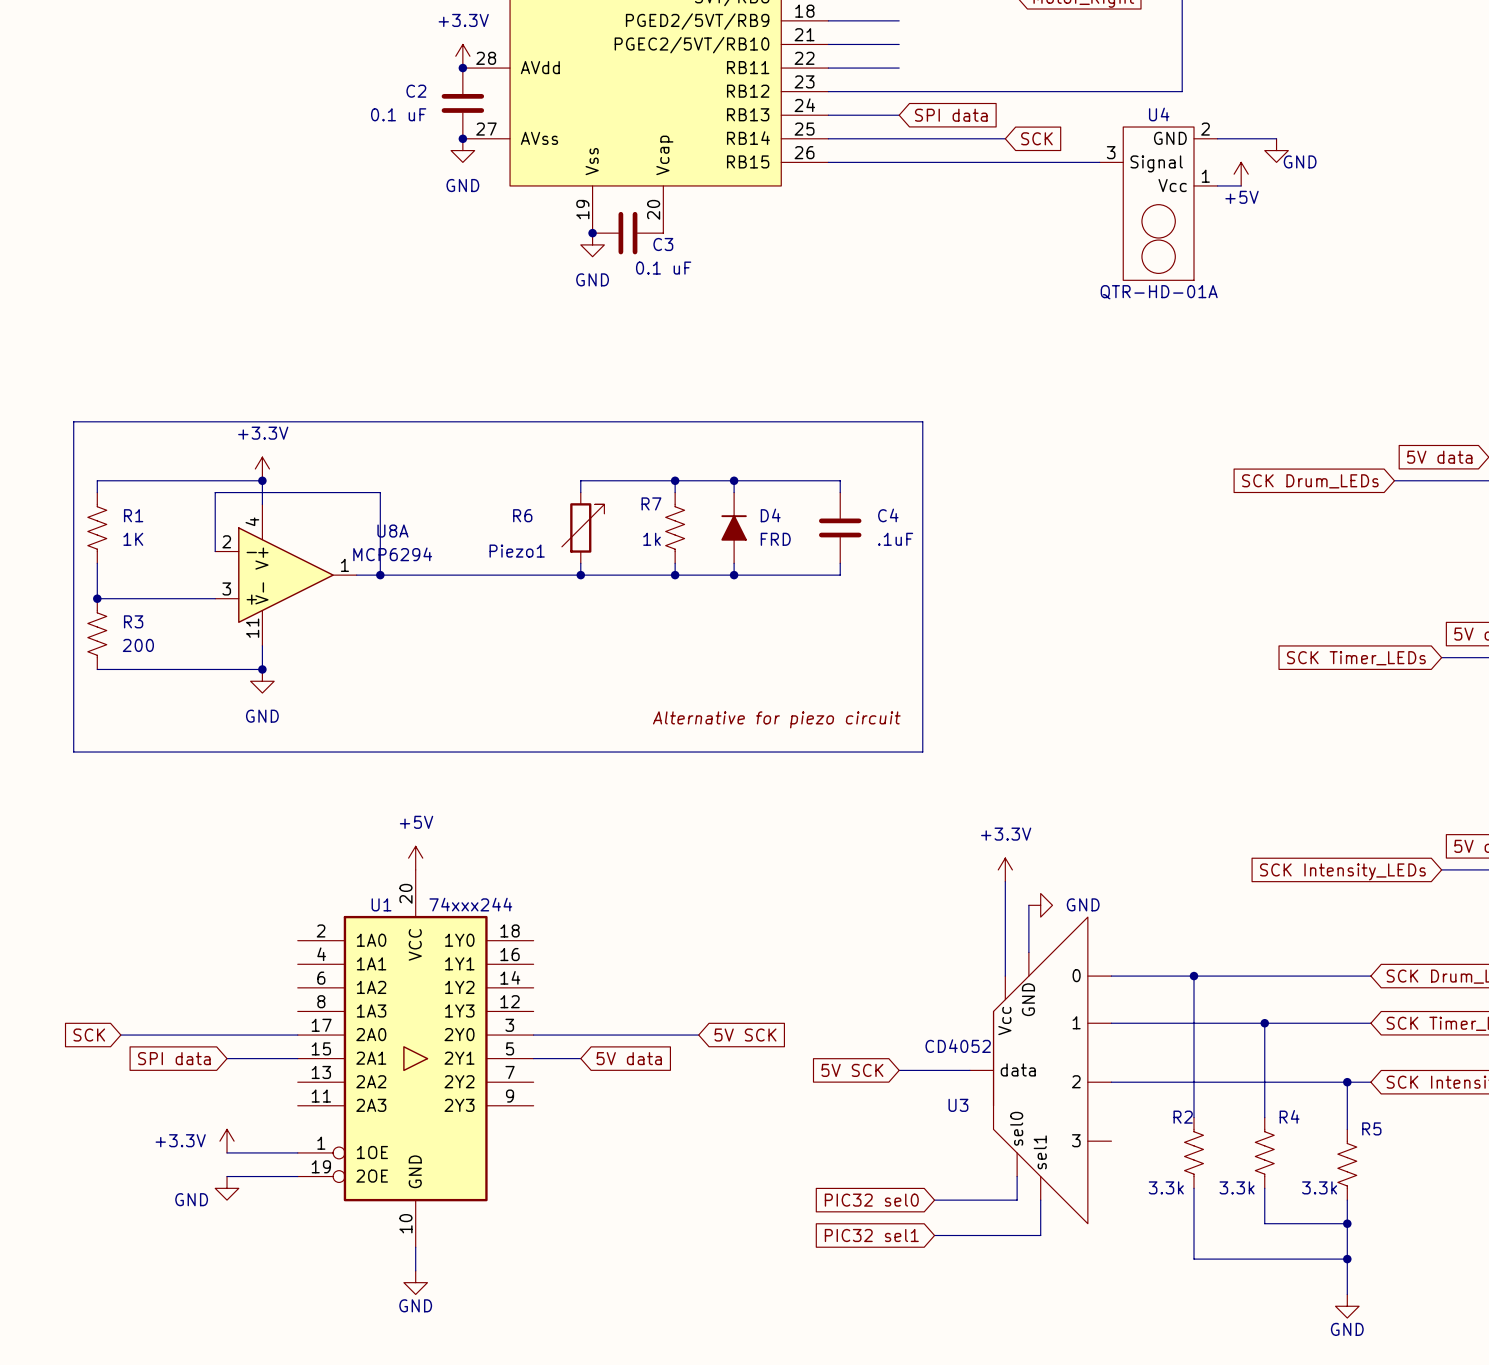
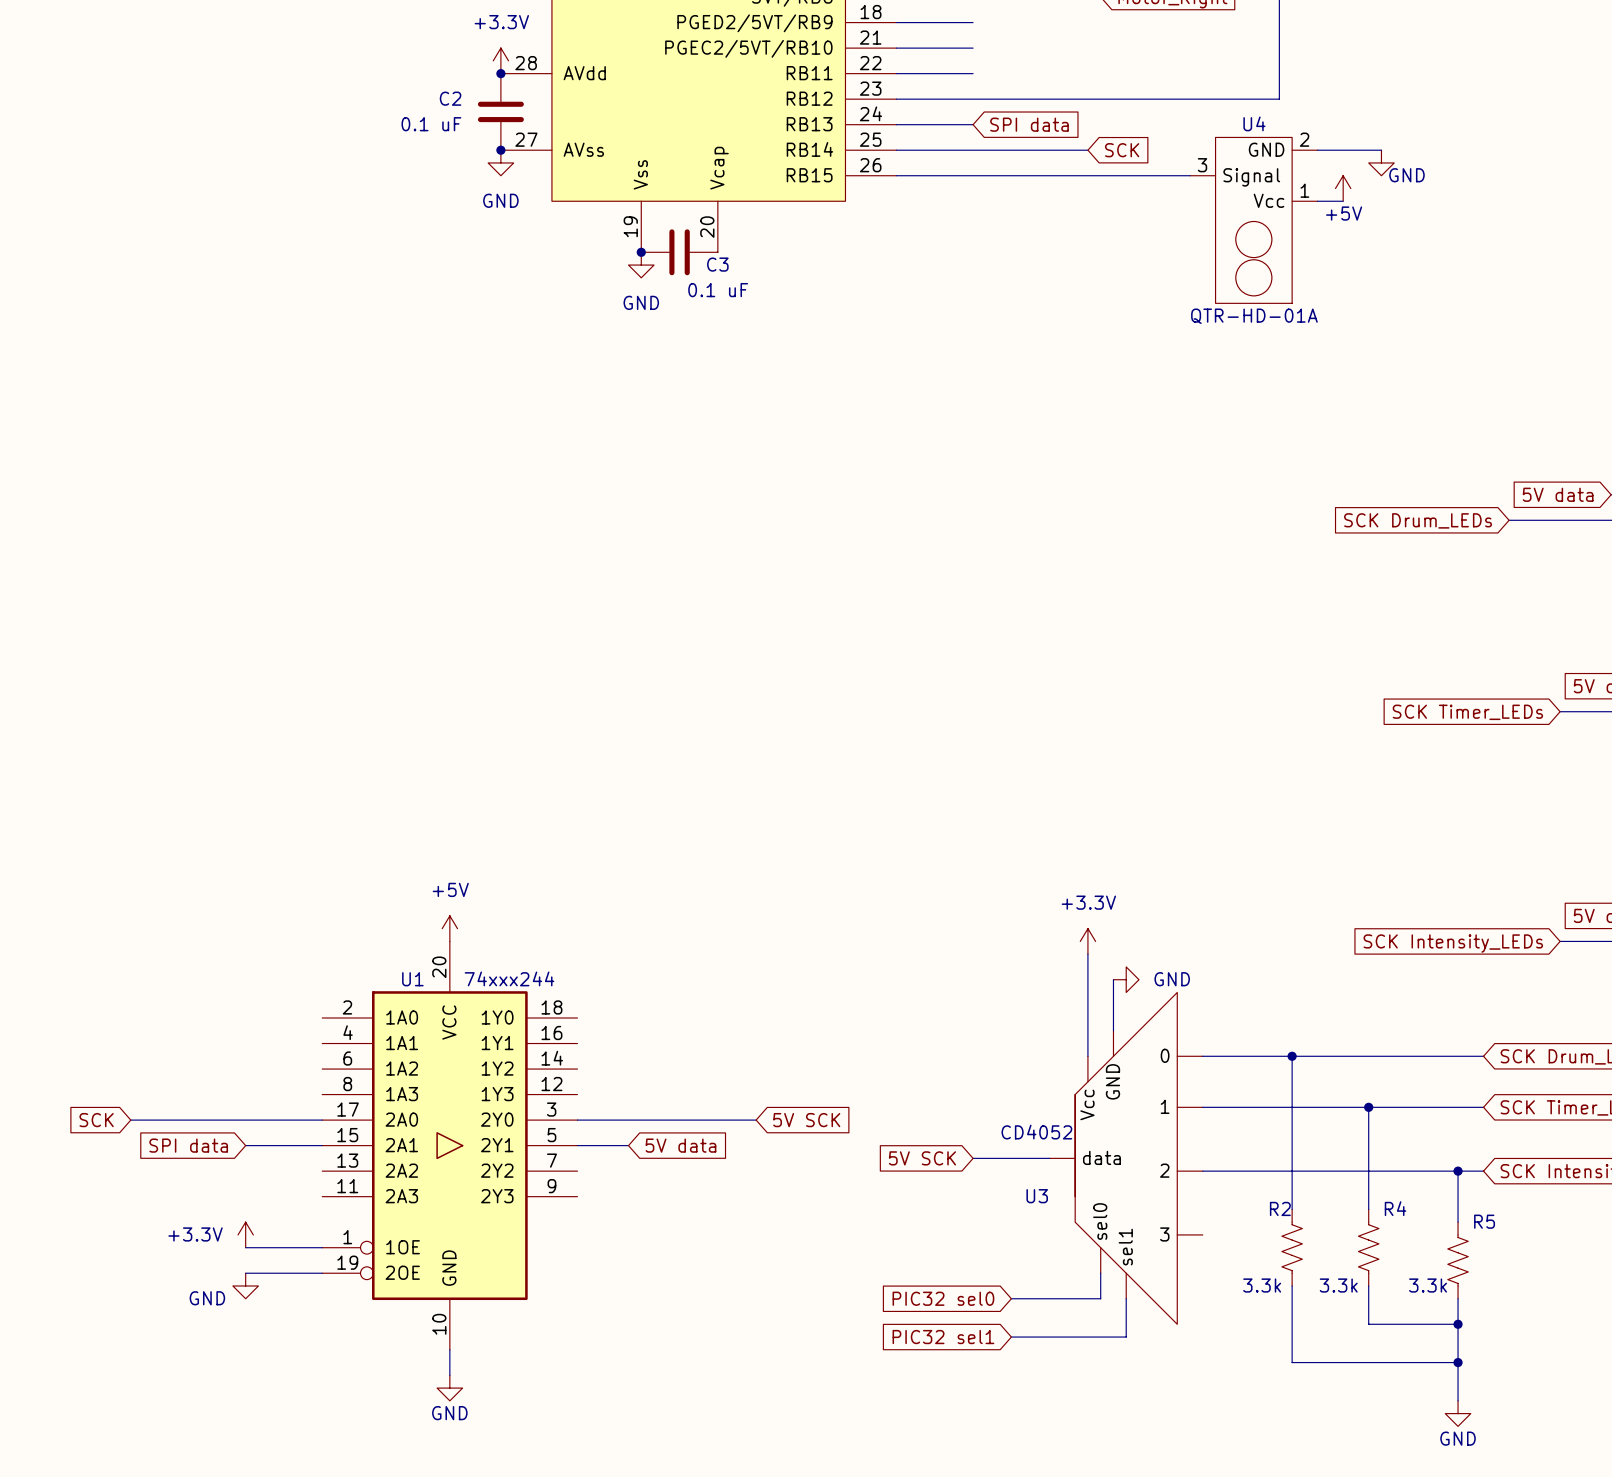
line: (73, 421) (922, 421) (922, 752) (73, 752) (73, 421) -> none
power symbol: +3.3V (262, 468) -> none
junction: (262, 480) -> none
wire: (675, 480) (675, 492) -> none
junction: (675, 480) -> none
wire: (734, 480) (734, 492) -> none
junction: (734, 480) -> none
wire: (97, 492) (97, 480) (262, 480) (262, 504) -> none
wire: (580, 492) (580, 480) (840, 480) (840, 492) -> none
R1: 1K (97, 527) -> none
R6: Piezo1 (583, 527) -> none
R7: 1k (675, 527) -> none
D4: FRD (734, 527) -> none
C4: .1uF (840, 527) -> none
wire: (215, 551) (215, 492) (380, 492) (380, 575) -> none
wire: (97, 563) (97, 598) (215, 598) -> none
wire: (580, 563) (580, 575) -> none
wire: (675, 563) (675, 575) -> none
wire: (734, 563) (734, 575) -> none
wire: (840, 563) (840, 575) (356, 575) -> none
U8A: MCP6294 (285, 575) -> none
junction: (380, 575) -> none
junction: (580, 575) -> none
junction: (675, 575) -> none
junction: (734, 575) -> none
junction: (97, 598) -> none
R3: 200 (97, 634) -> none
wire: (262, 645) (262, 669) (97, 669) -> none
junction: (262, 669) -> none
power symbol: GND (262, 681) -> none
label: Alternative for piezo circuit (776, 719) -> none

